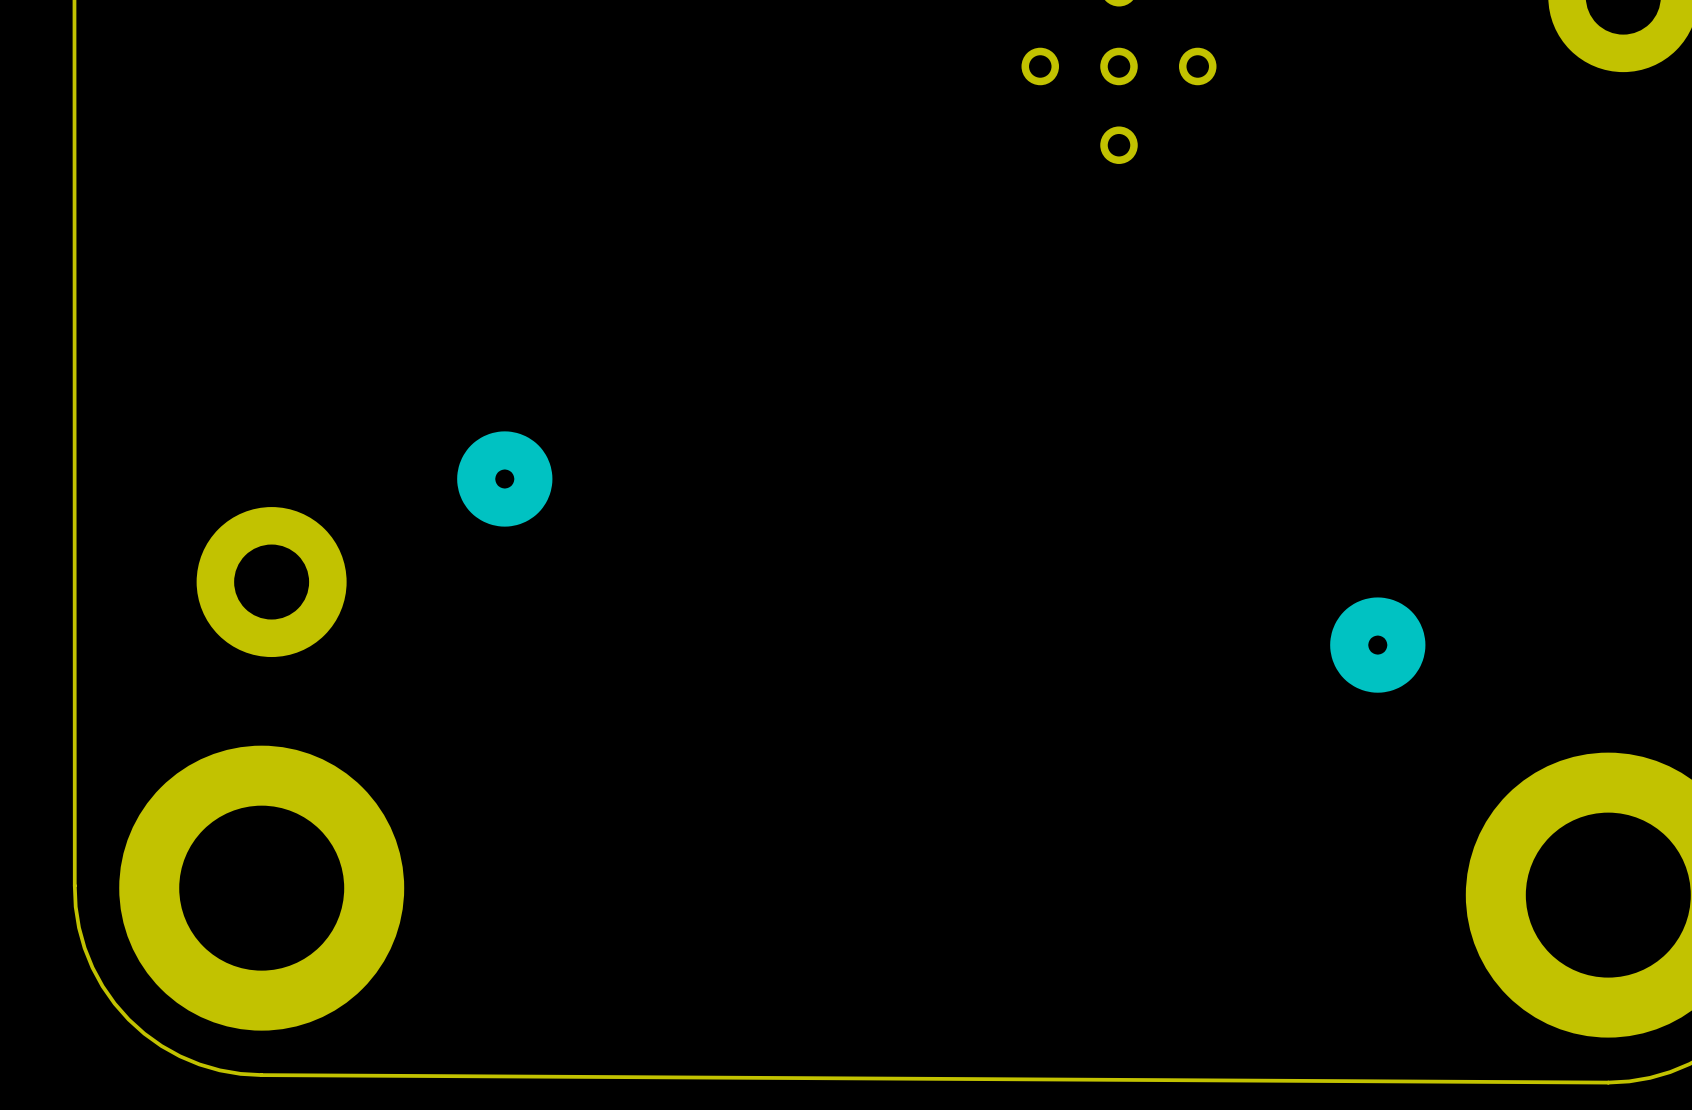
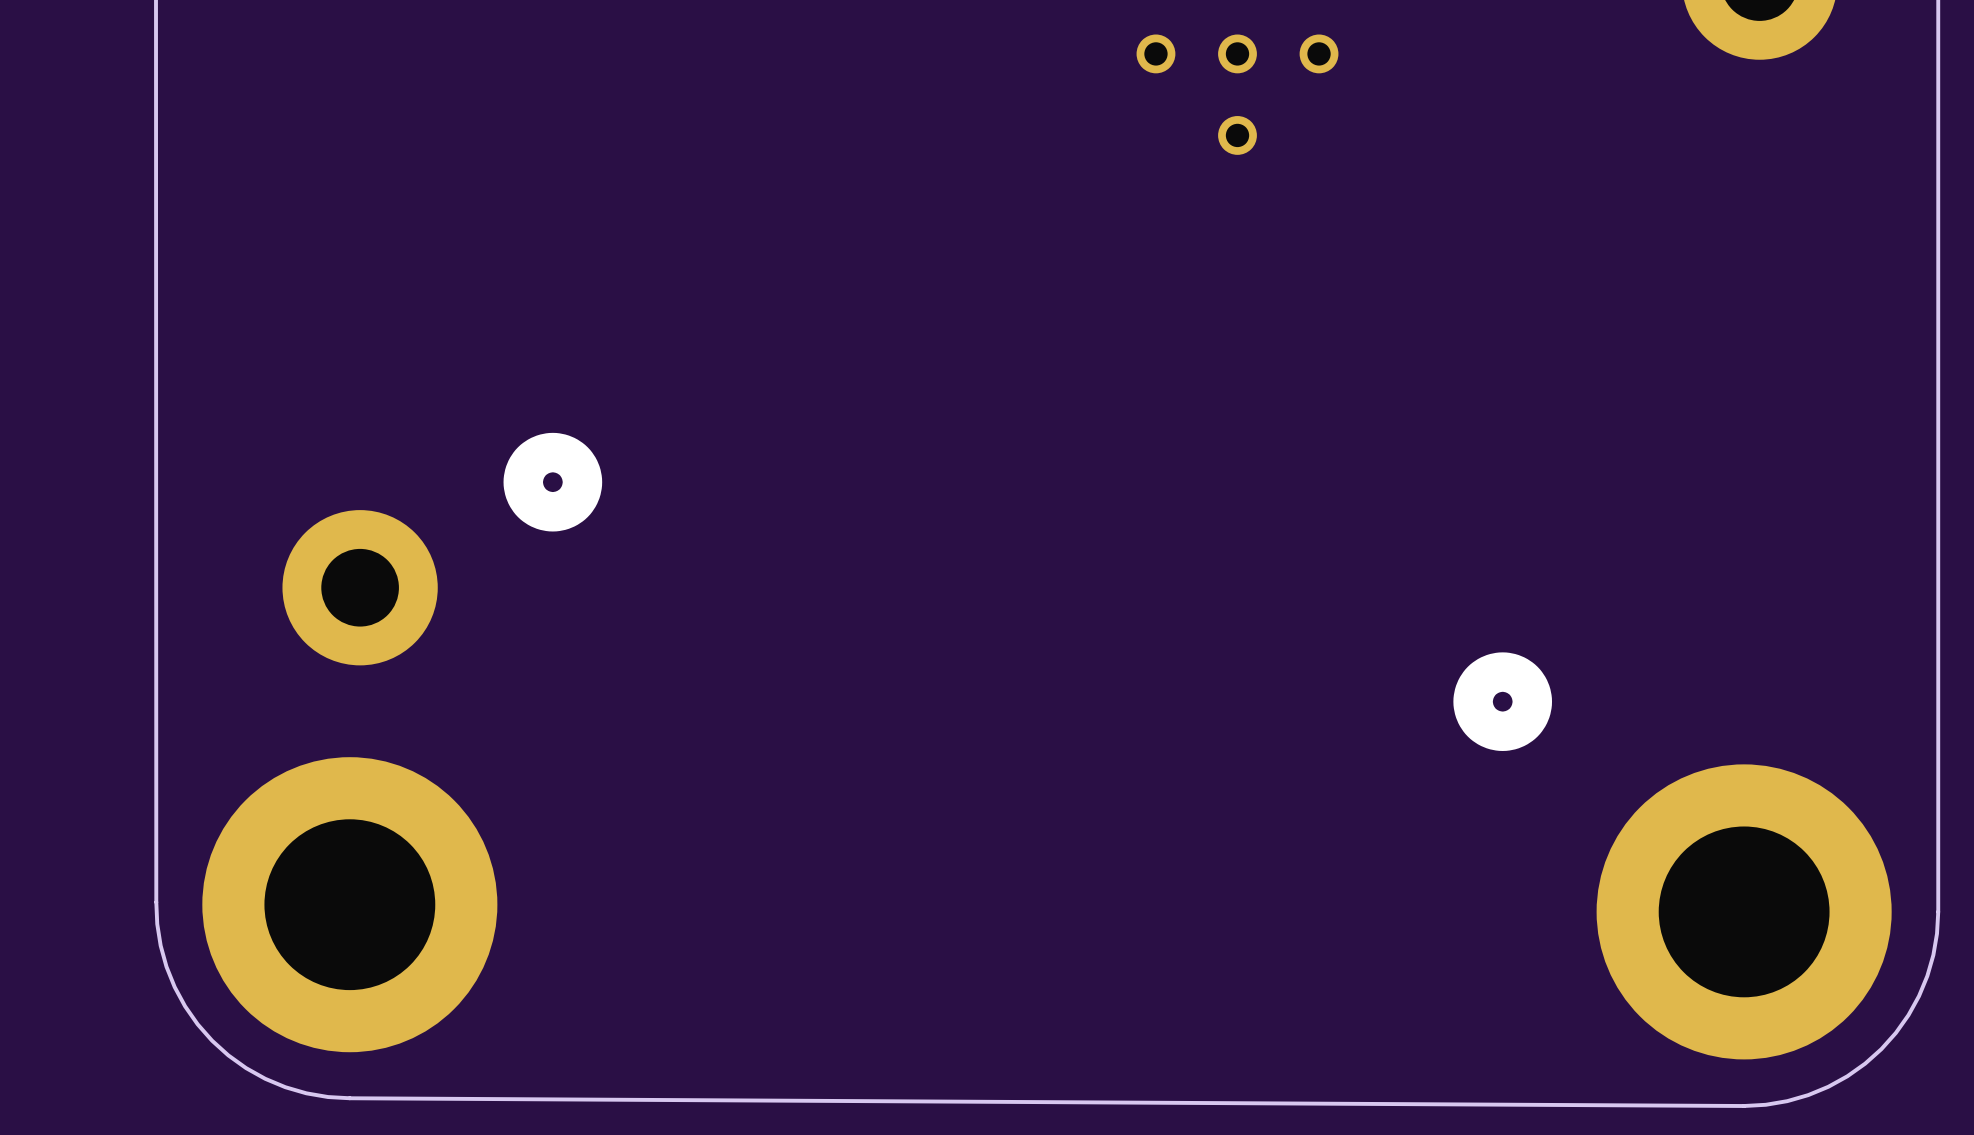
part position: (504, 478) -> (552, 482)
part position: (1377, 645) -> (1502, 701)

